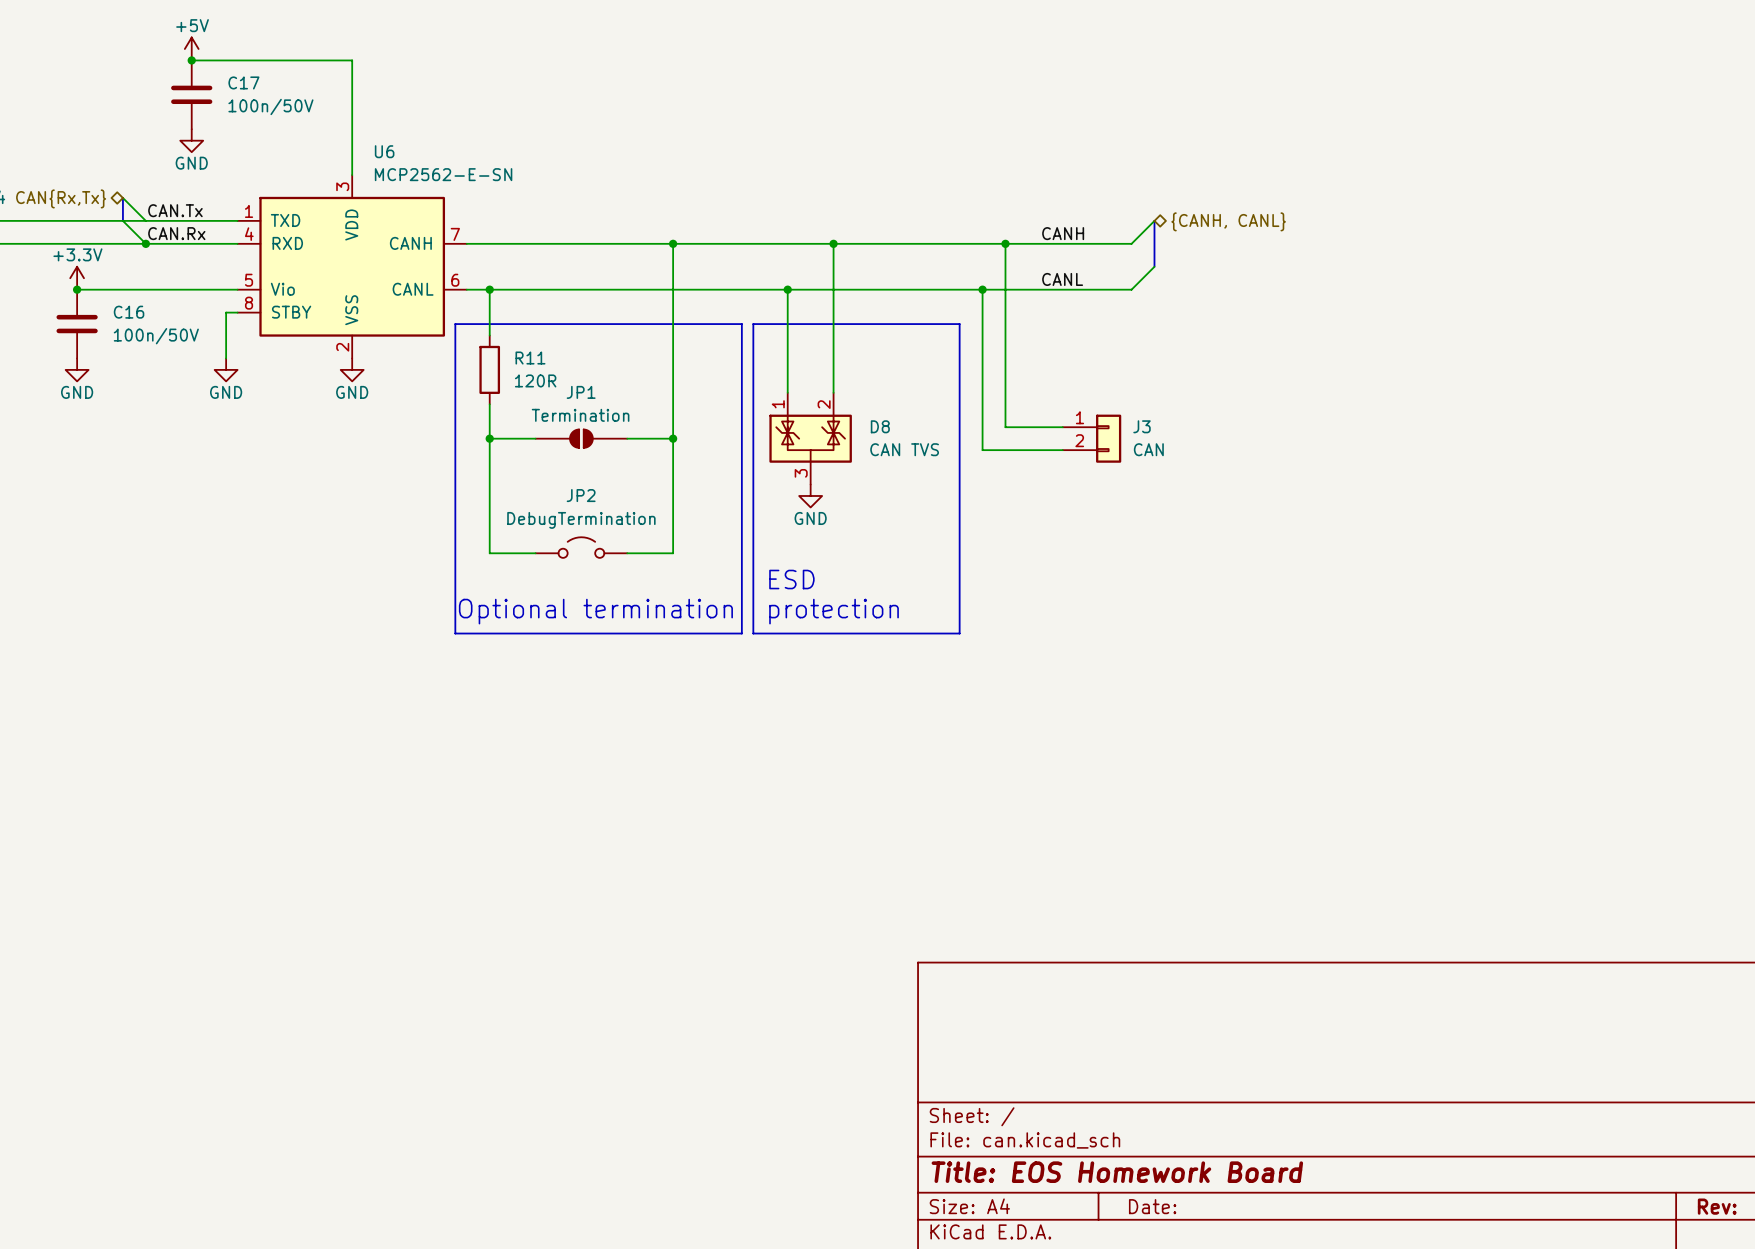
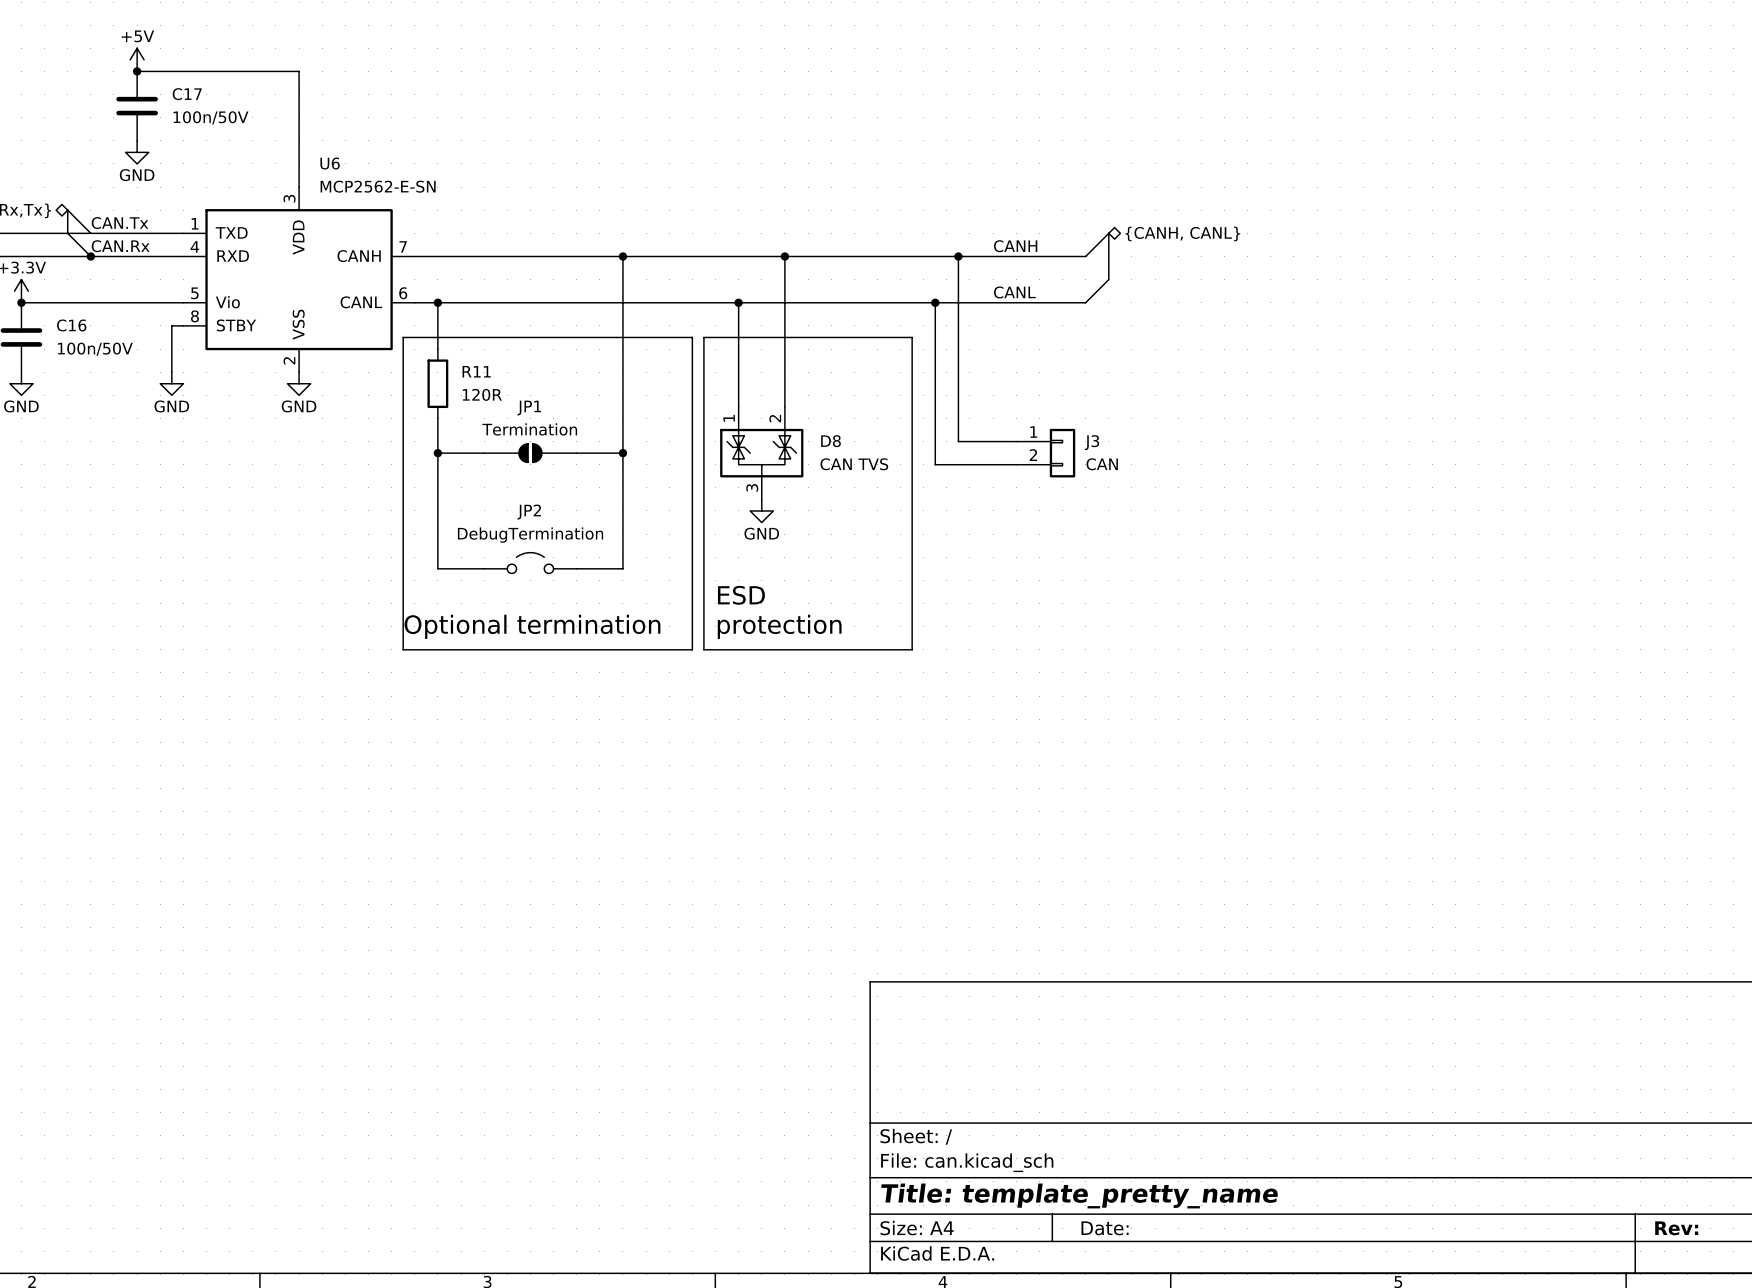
title block: Title: EOS Homework Board (1117, 1172) -> Title: template_pretty_name (1079, 1195)

